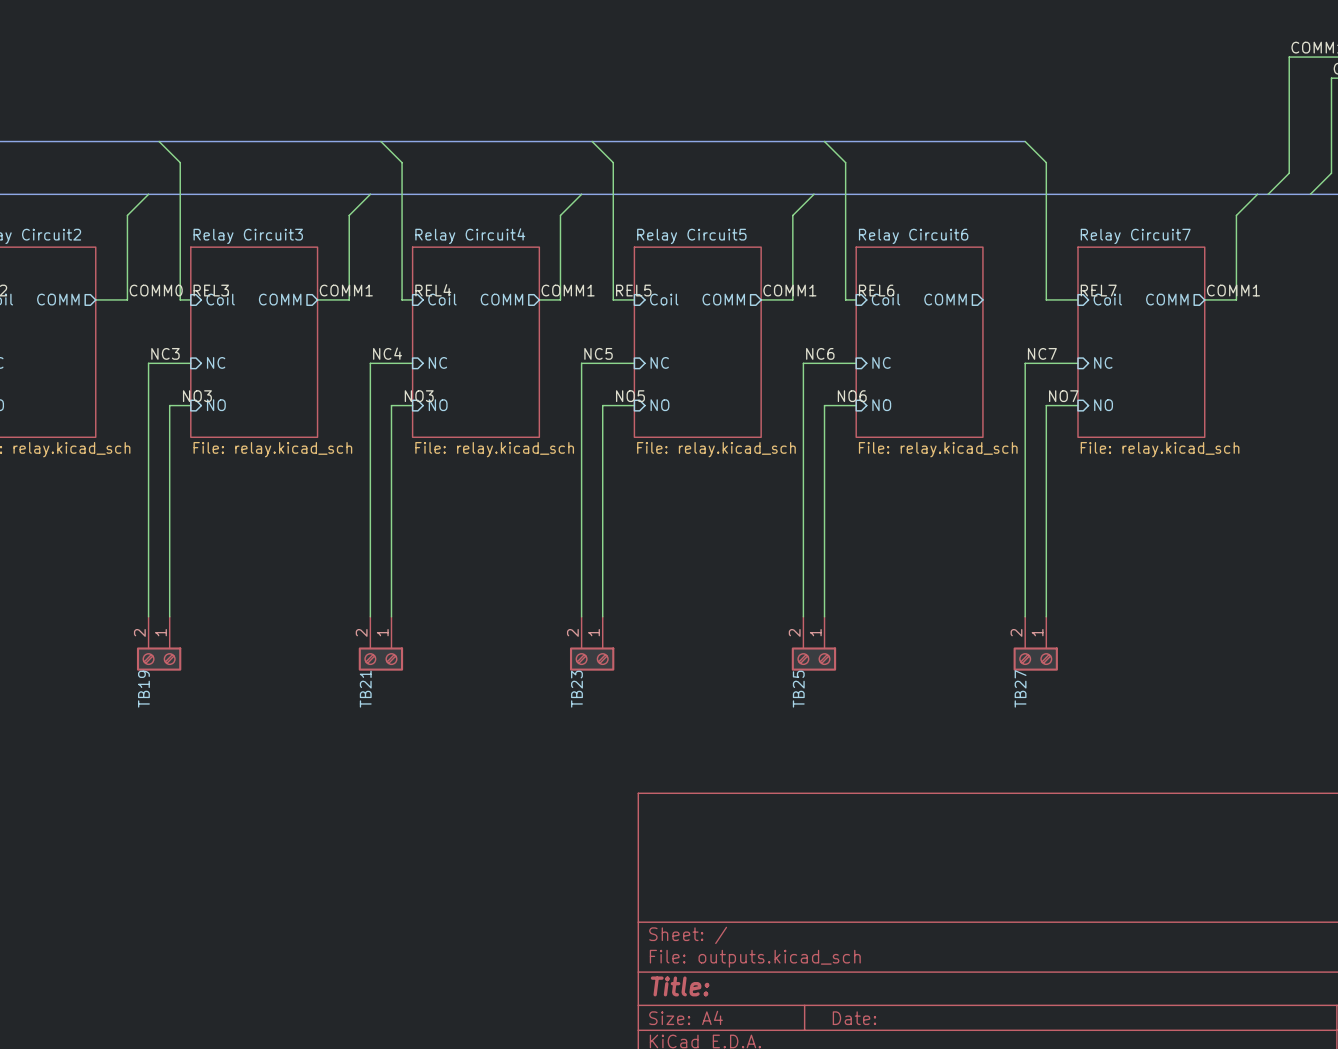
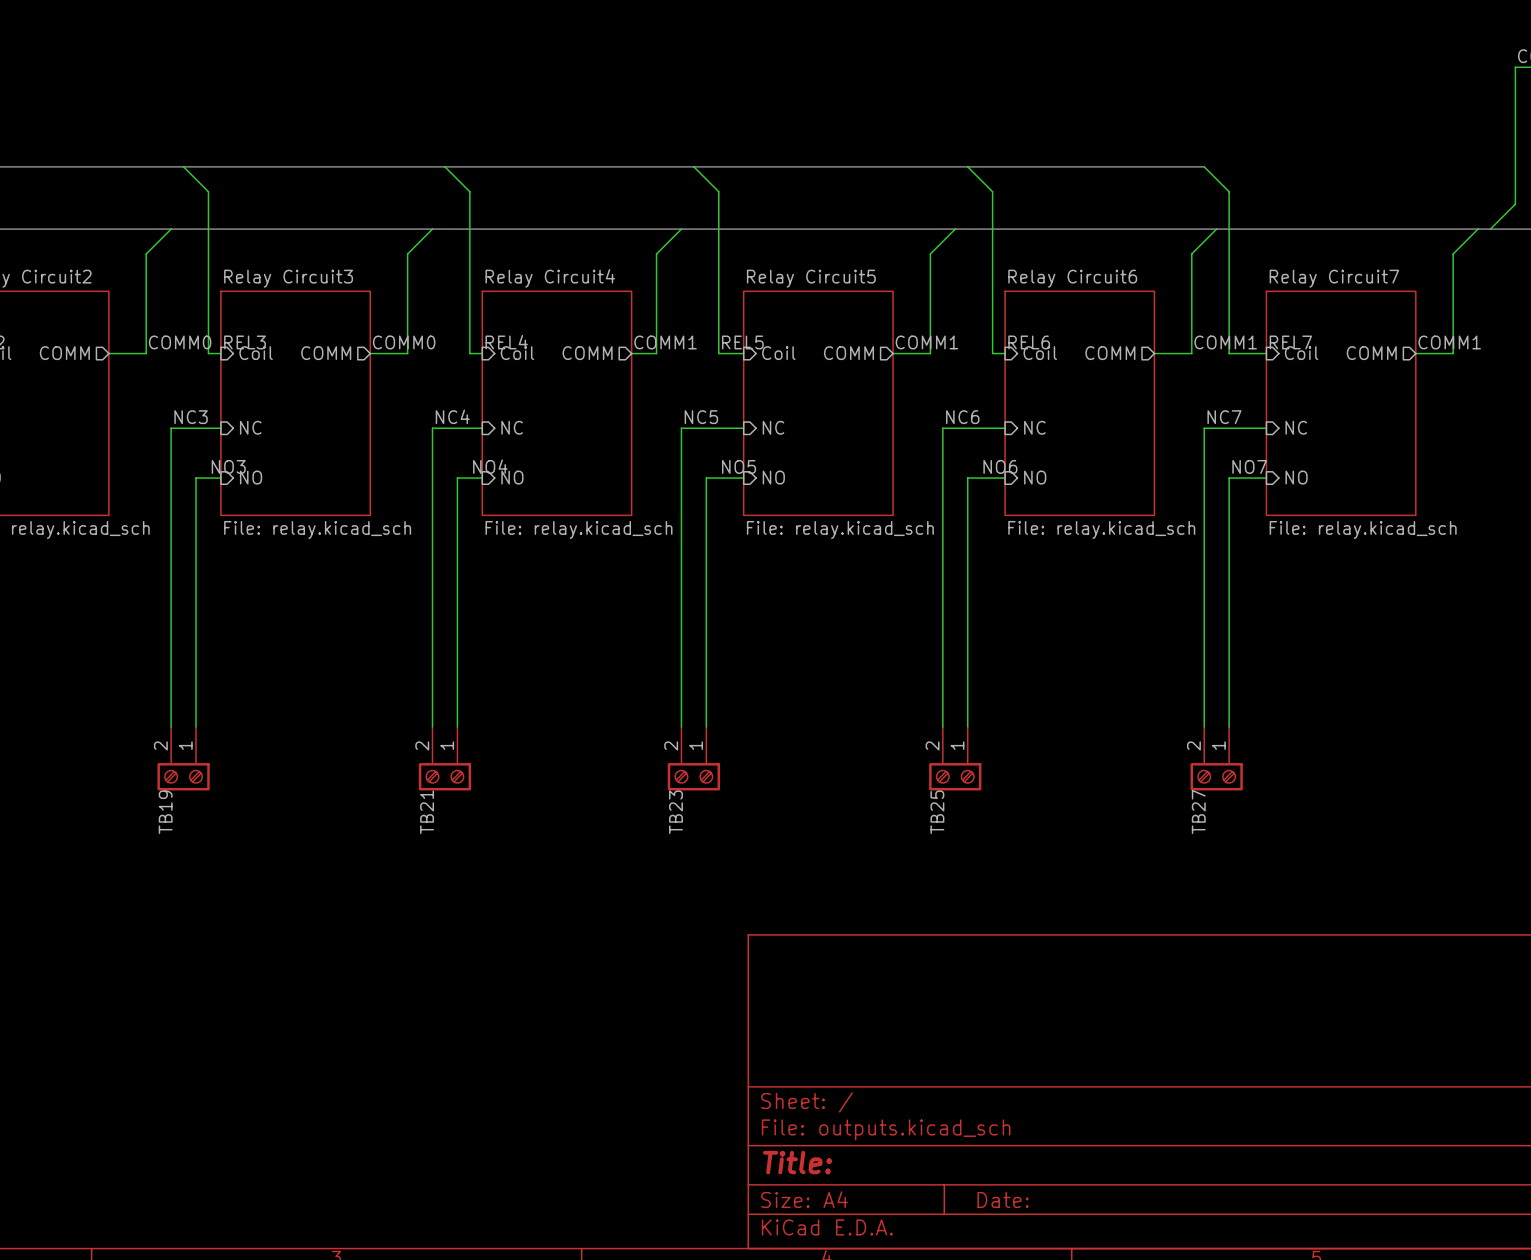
wire: none -> (1216, 229) (1191, 253) (1191, 353) (1154, 353)
label: COMM1 (346, 290) -> COMM0 (404, 342)
label: none -> COMM1 (1225, 342)
label: NO3 (419, 396) -> NO4 (490, 466)

